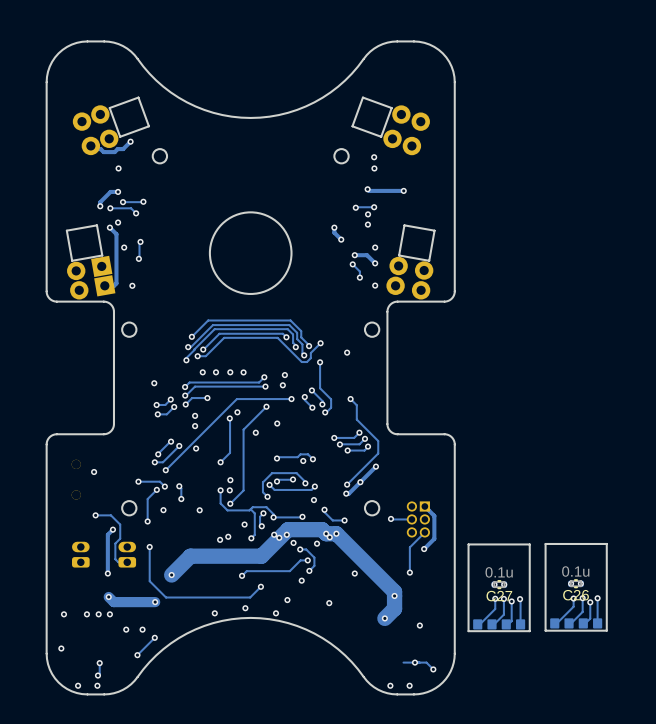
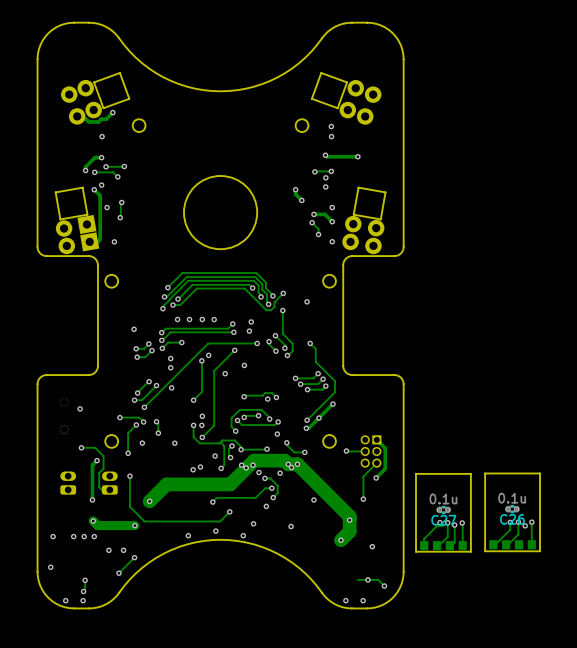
track: (495, 598) (495, 609) (477, 626) -> none
track: none -> (443, 526) (436, 526) (424, 538) (424, 545)
track: (590, 602) (590, 618) (583, 625) -> none

